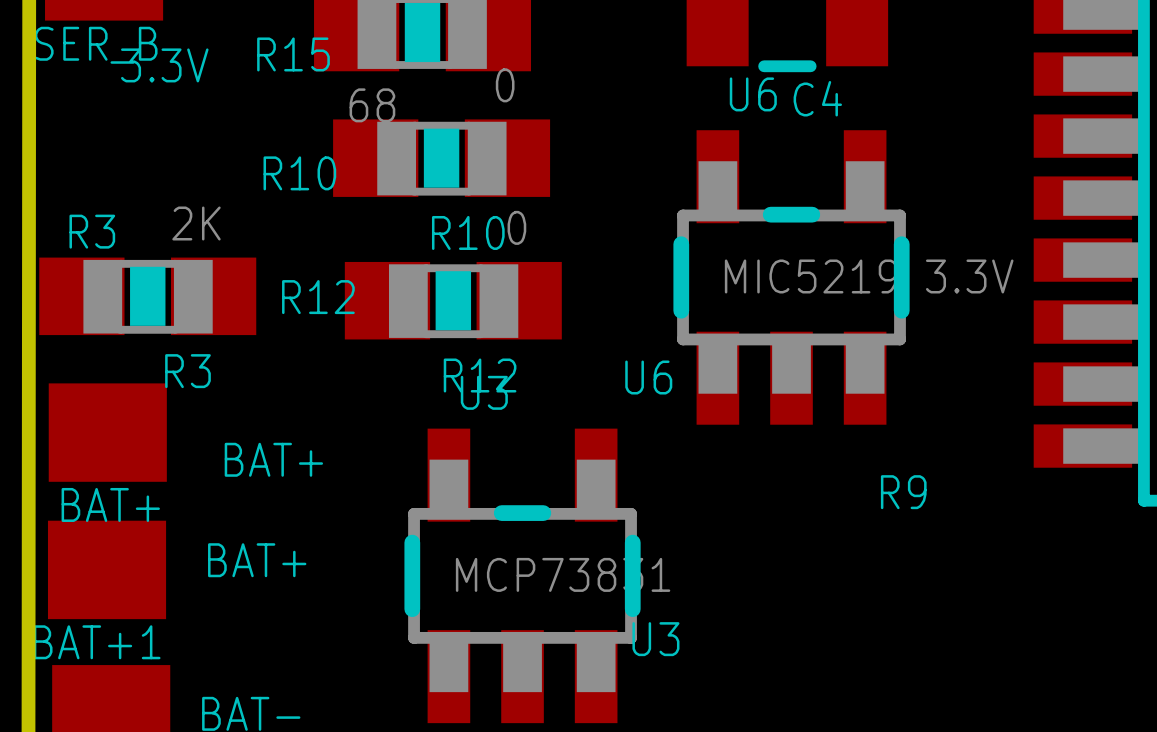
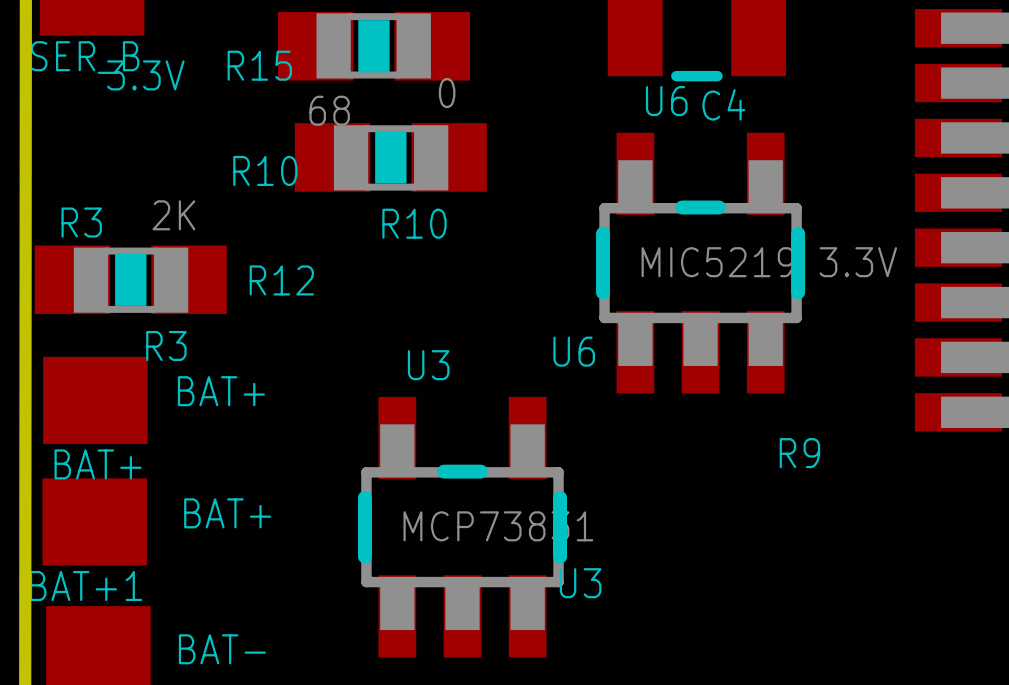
R12: 0 (453, 300) -> none
text position: BAT+ (273, 459) -> BAT+ (221, 391)

